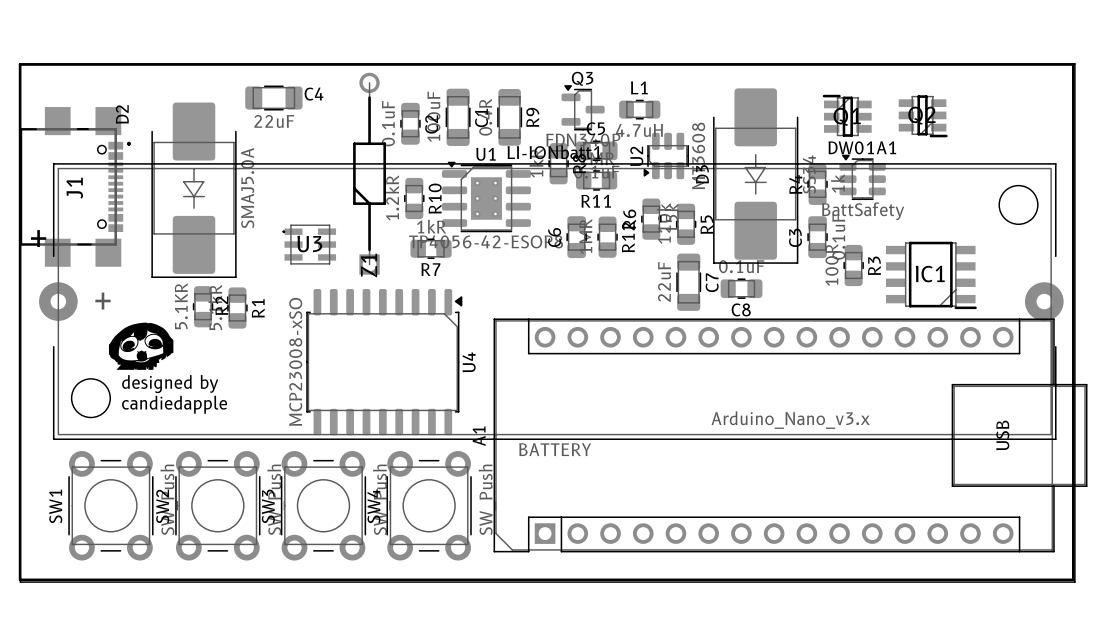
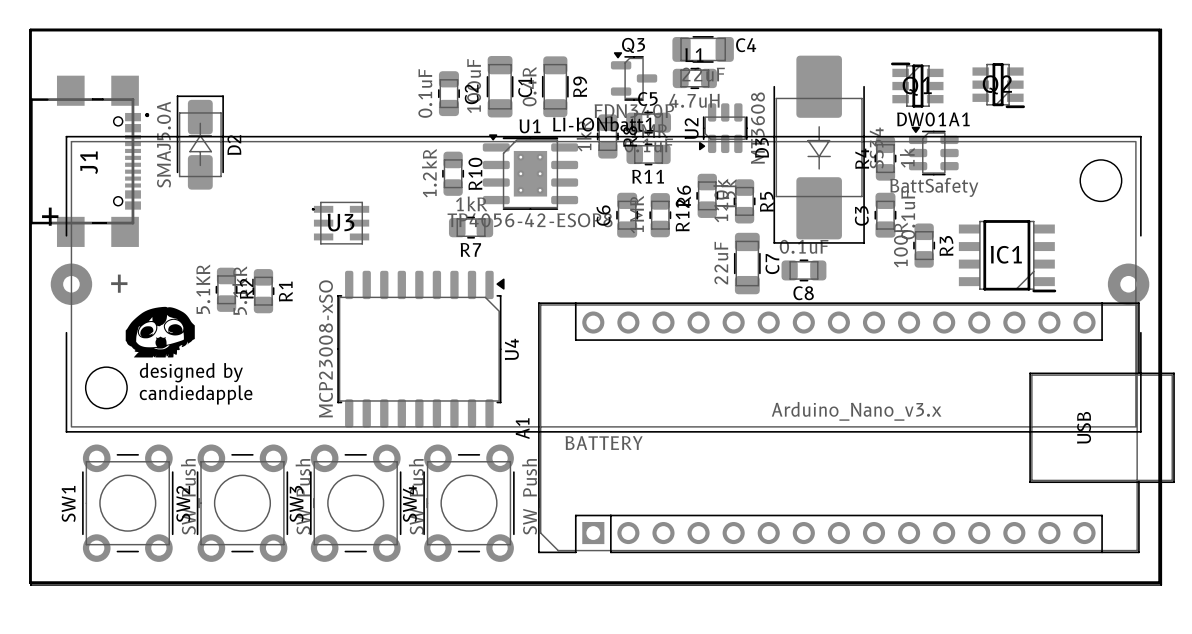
C4 position: (273, 98) -> (703, 49)
D2 footprint: [151, 102, 237, 278] -> [176, 95, 224, 190]
D2 name position: D2 (122, 114) -> D2 (234, 145)
Z1: (369, 173) -> none
D2 value position: SMAJ5.0A (247, 188) -> SMAJ5.0A (163, 144)

